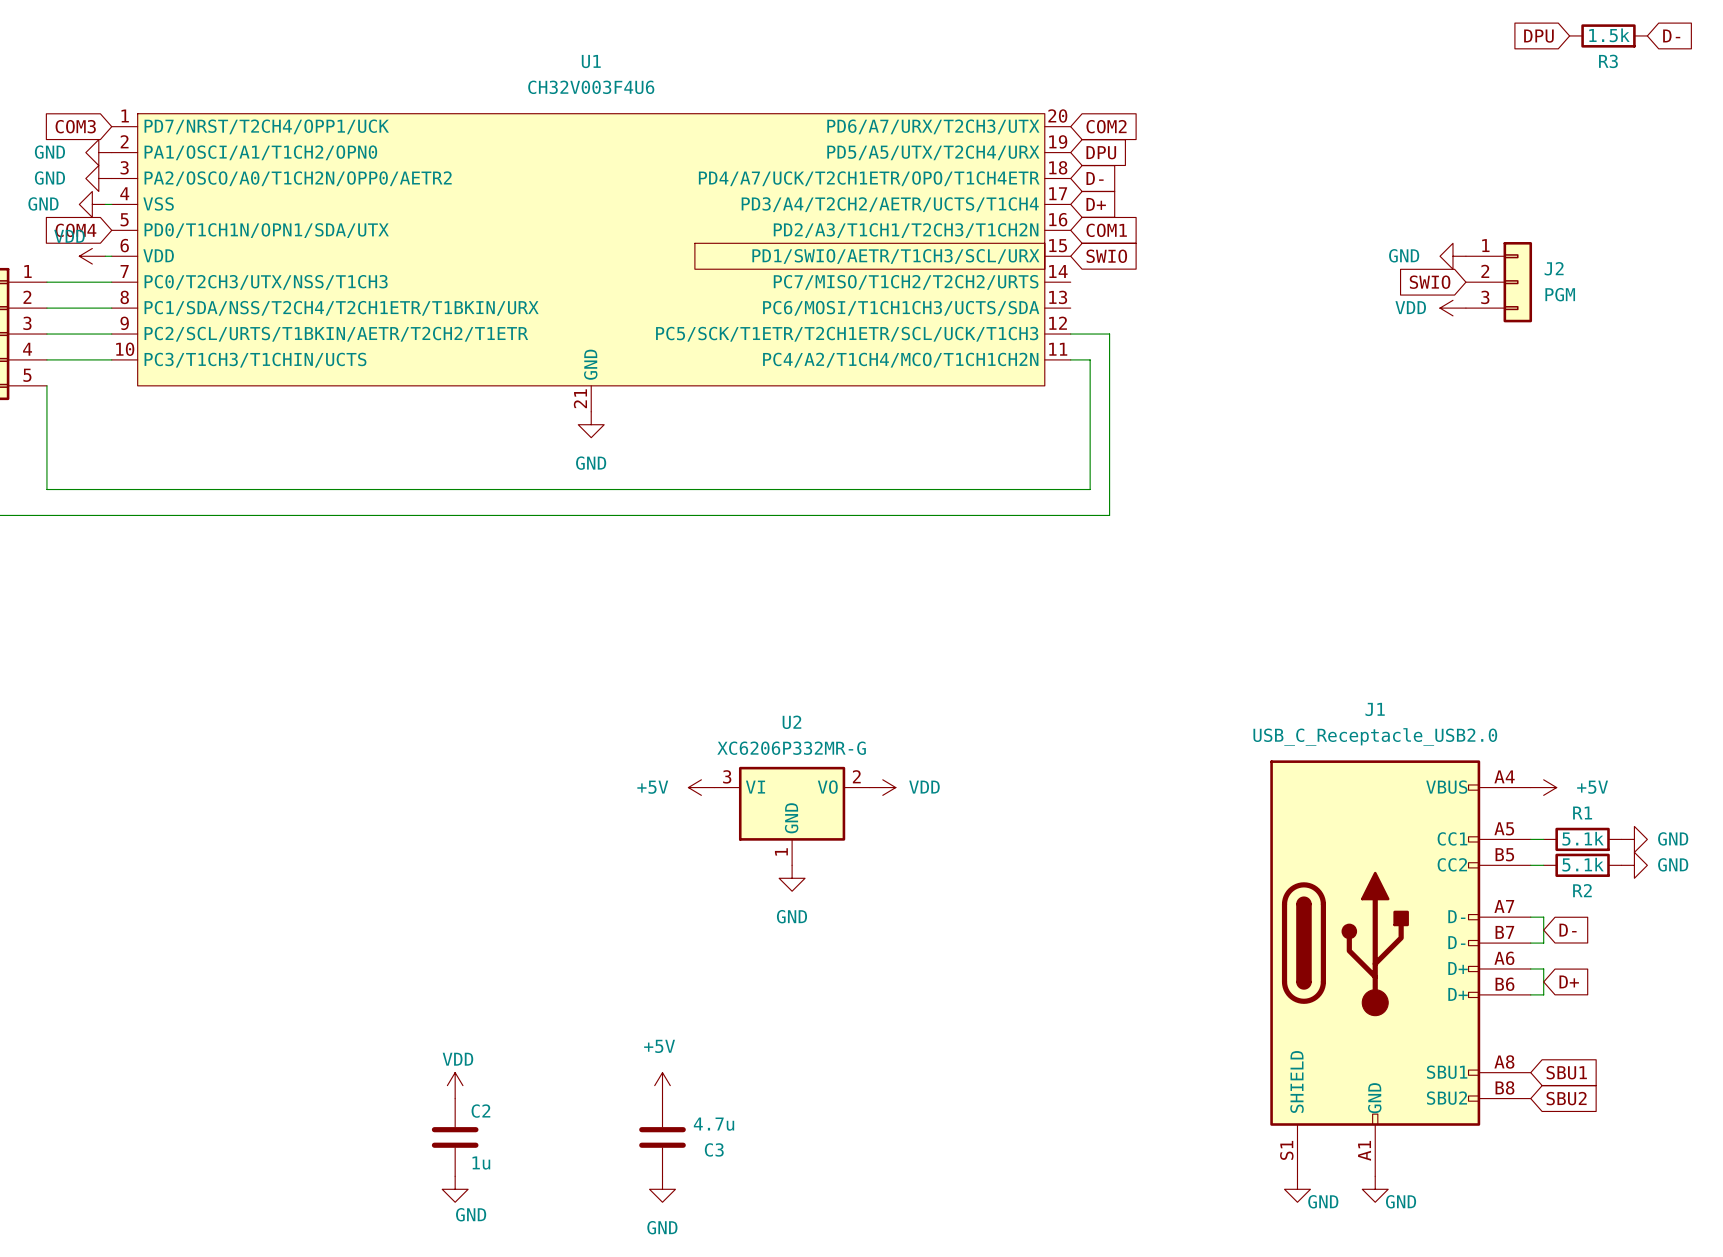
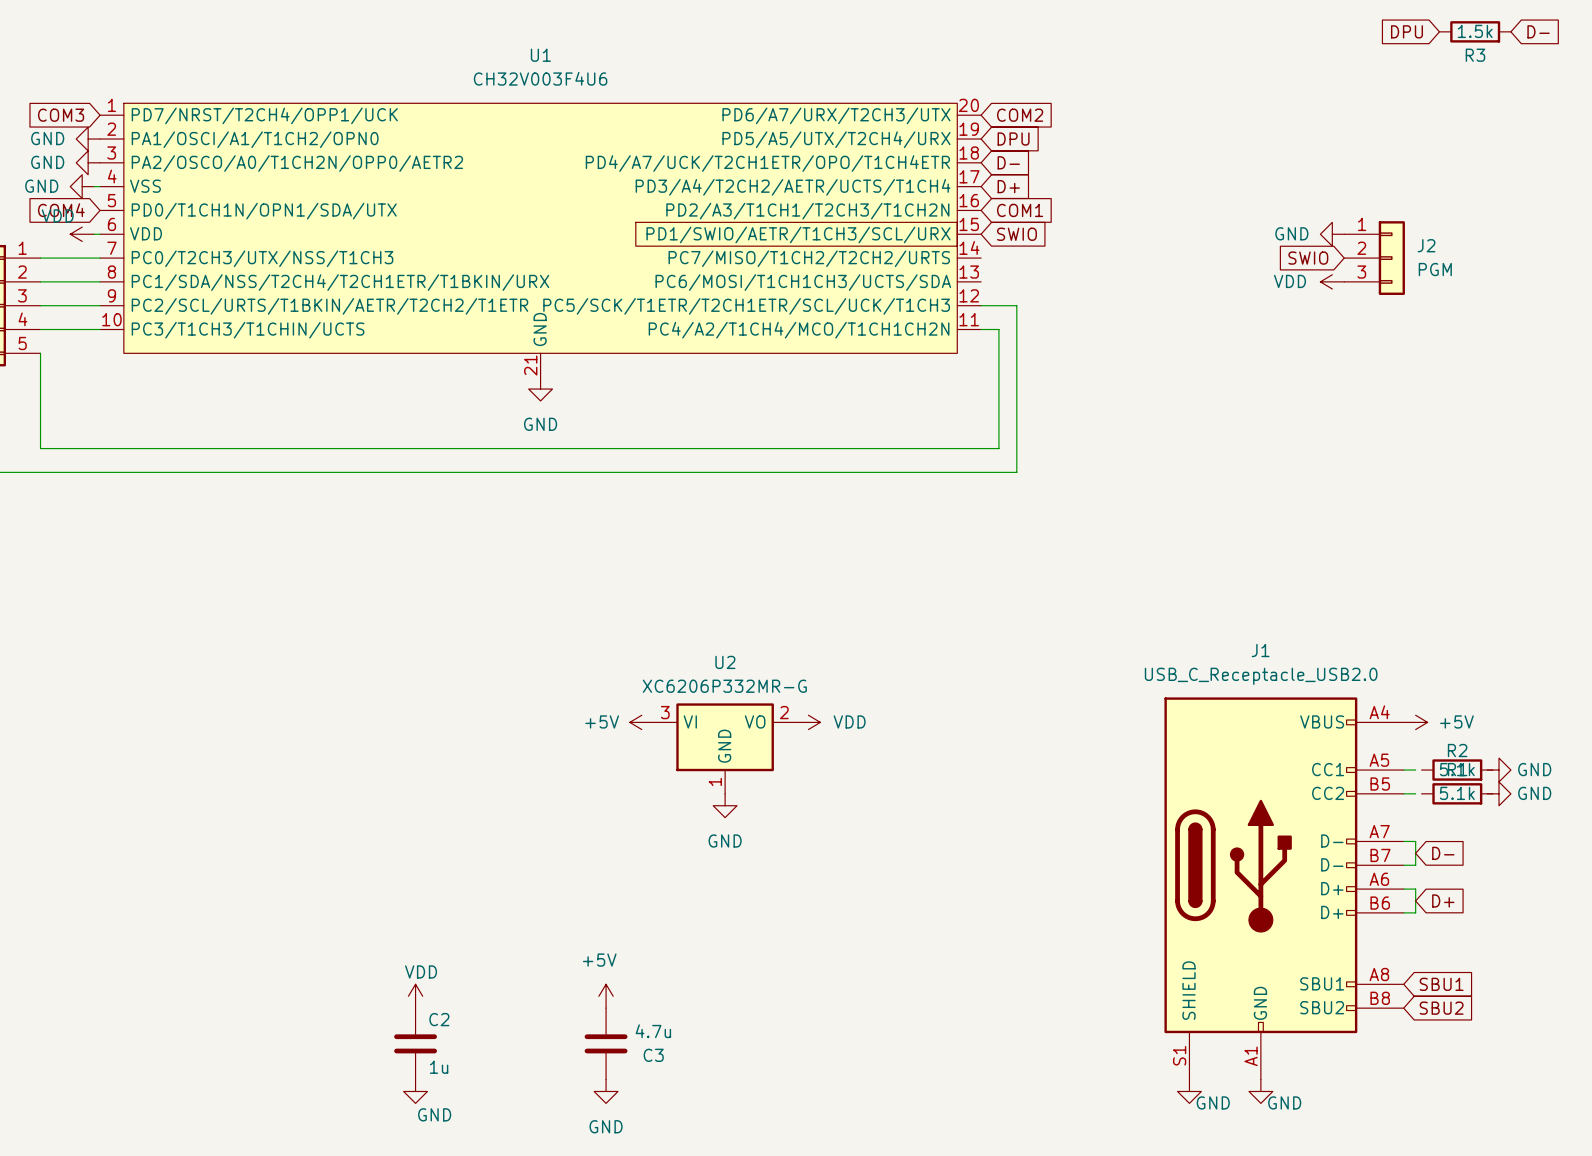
R1 position: (1582, 839) -> (1457, 793)
R2 position: (1582, 865) -> (1457, 770)
R2 name position: R2 (1582, 890) -> R2 (1457, 750)

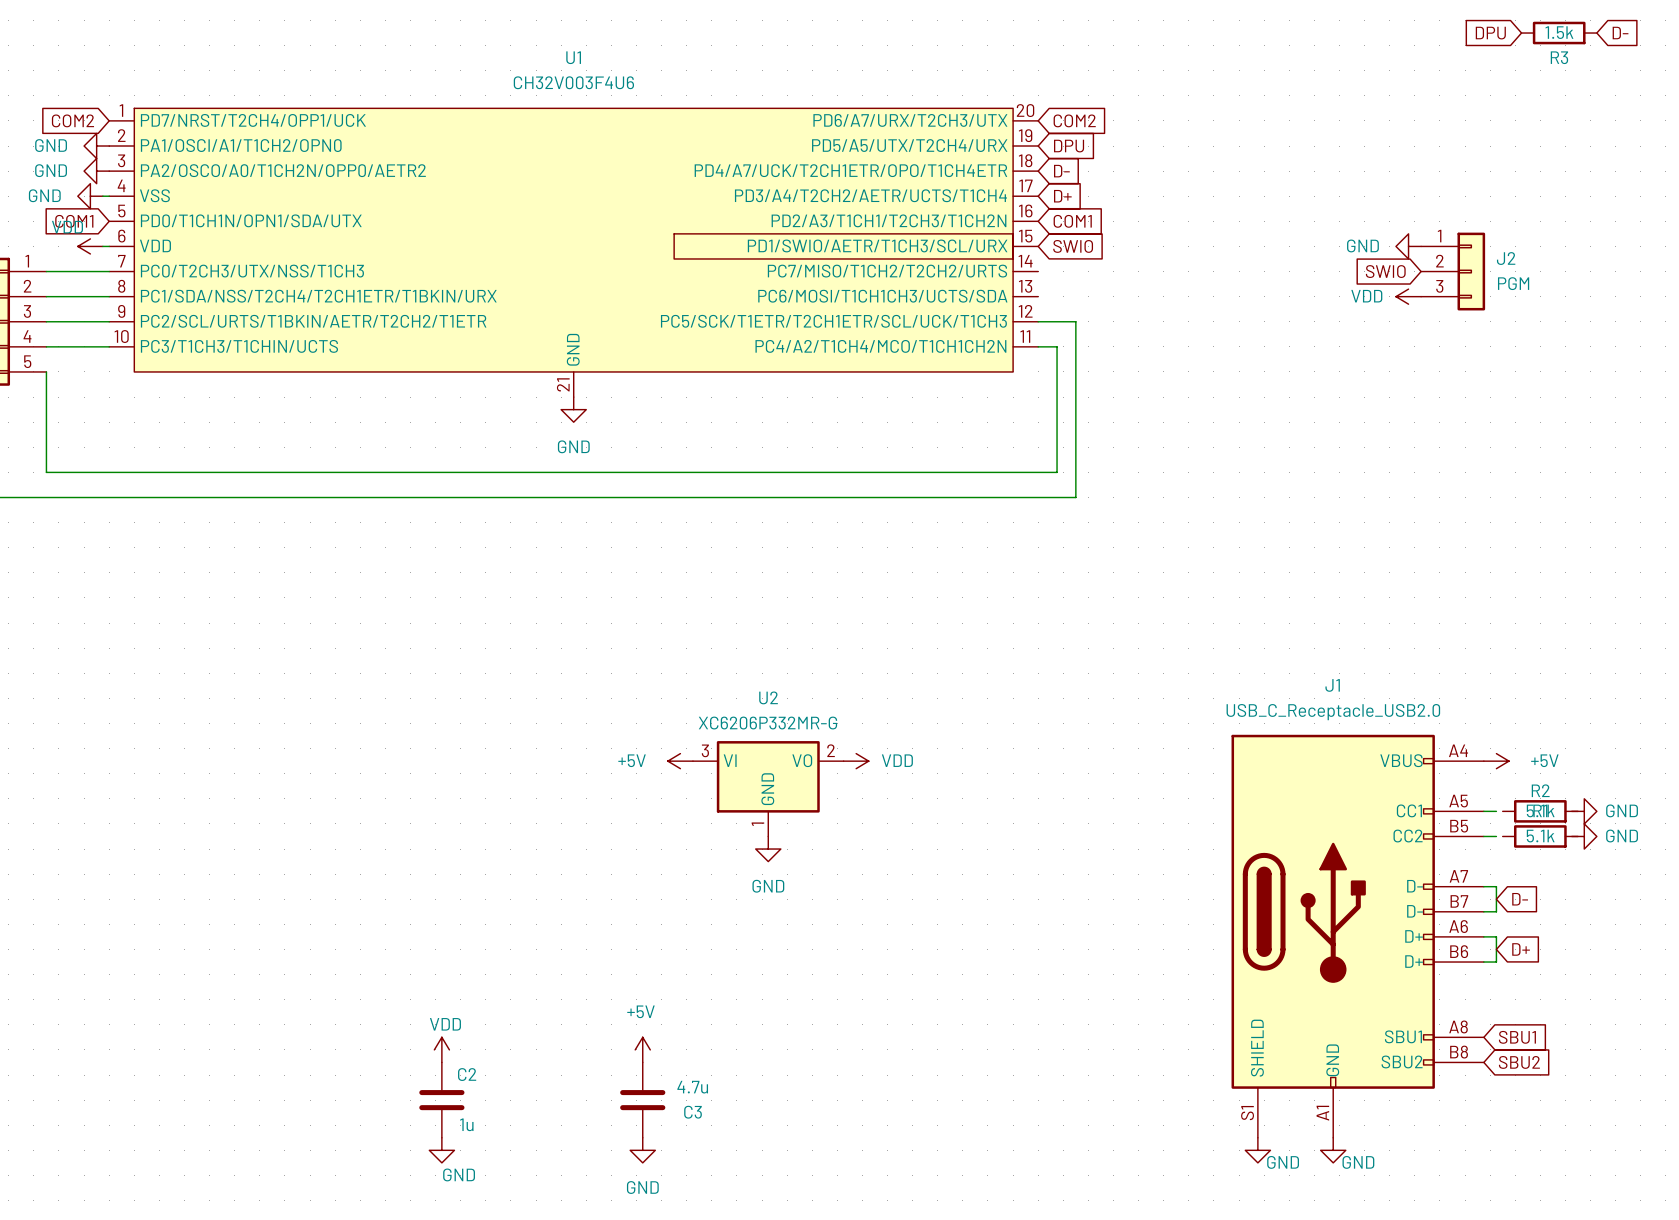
global label: COM3 (61, 115) -> COM2 (72, 120)
global label: COM4 (61, 210) -> COM1 (74, 221)

